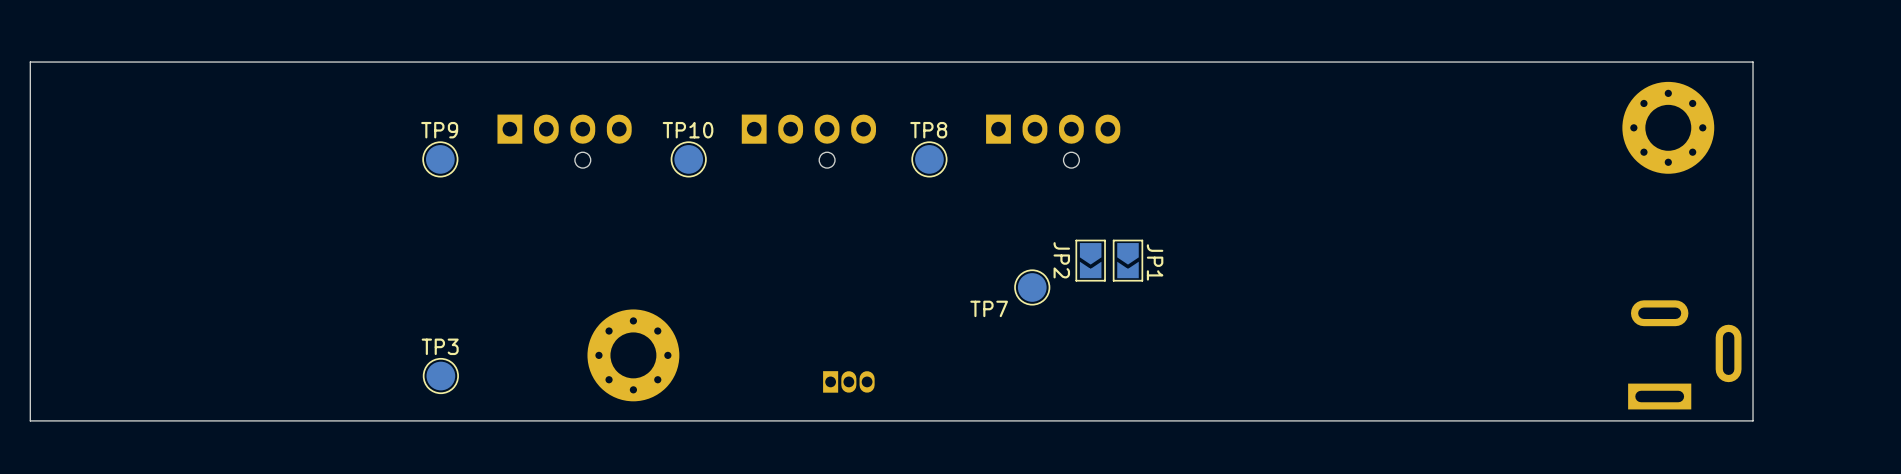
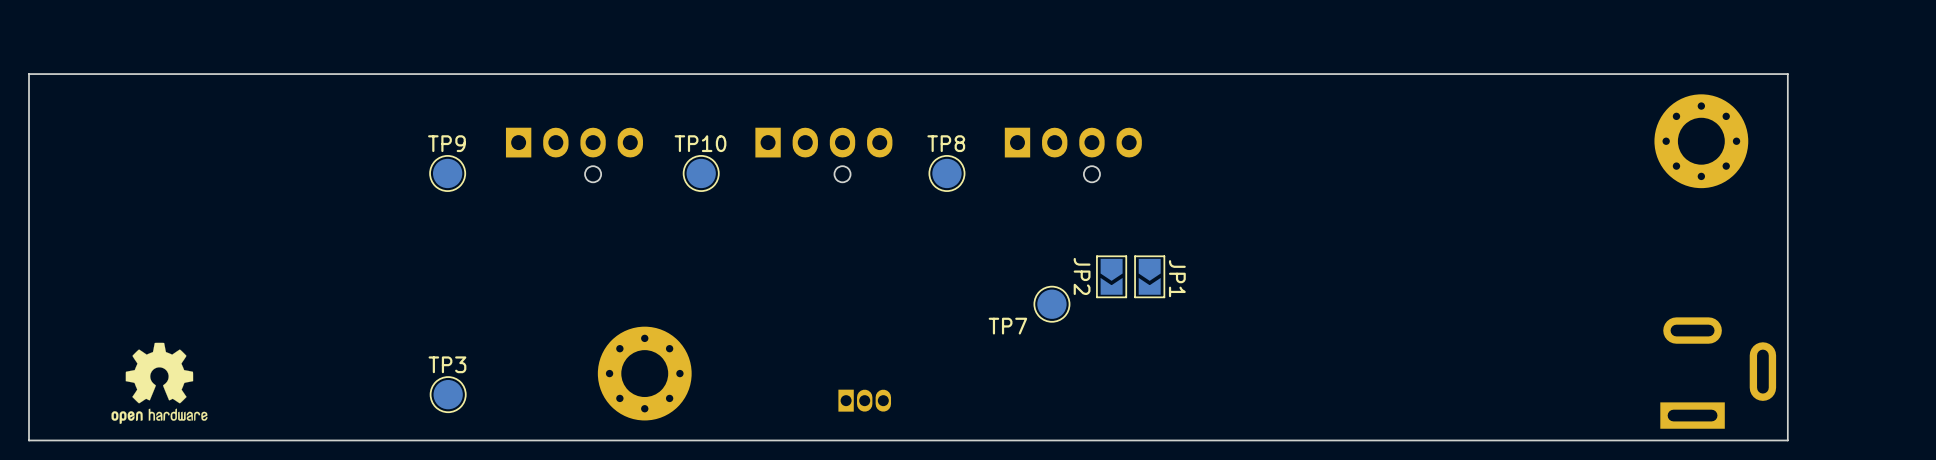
drawing: none -> [111, 342, 208, 425]

